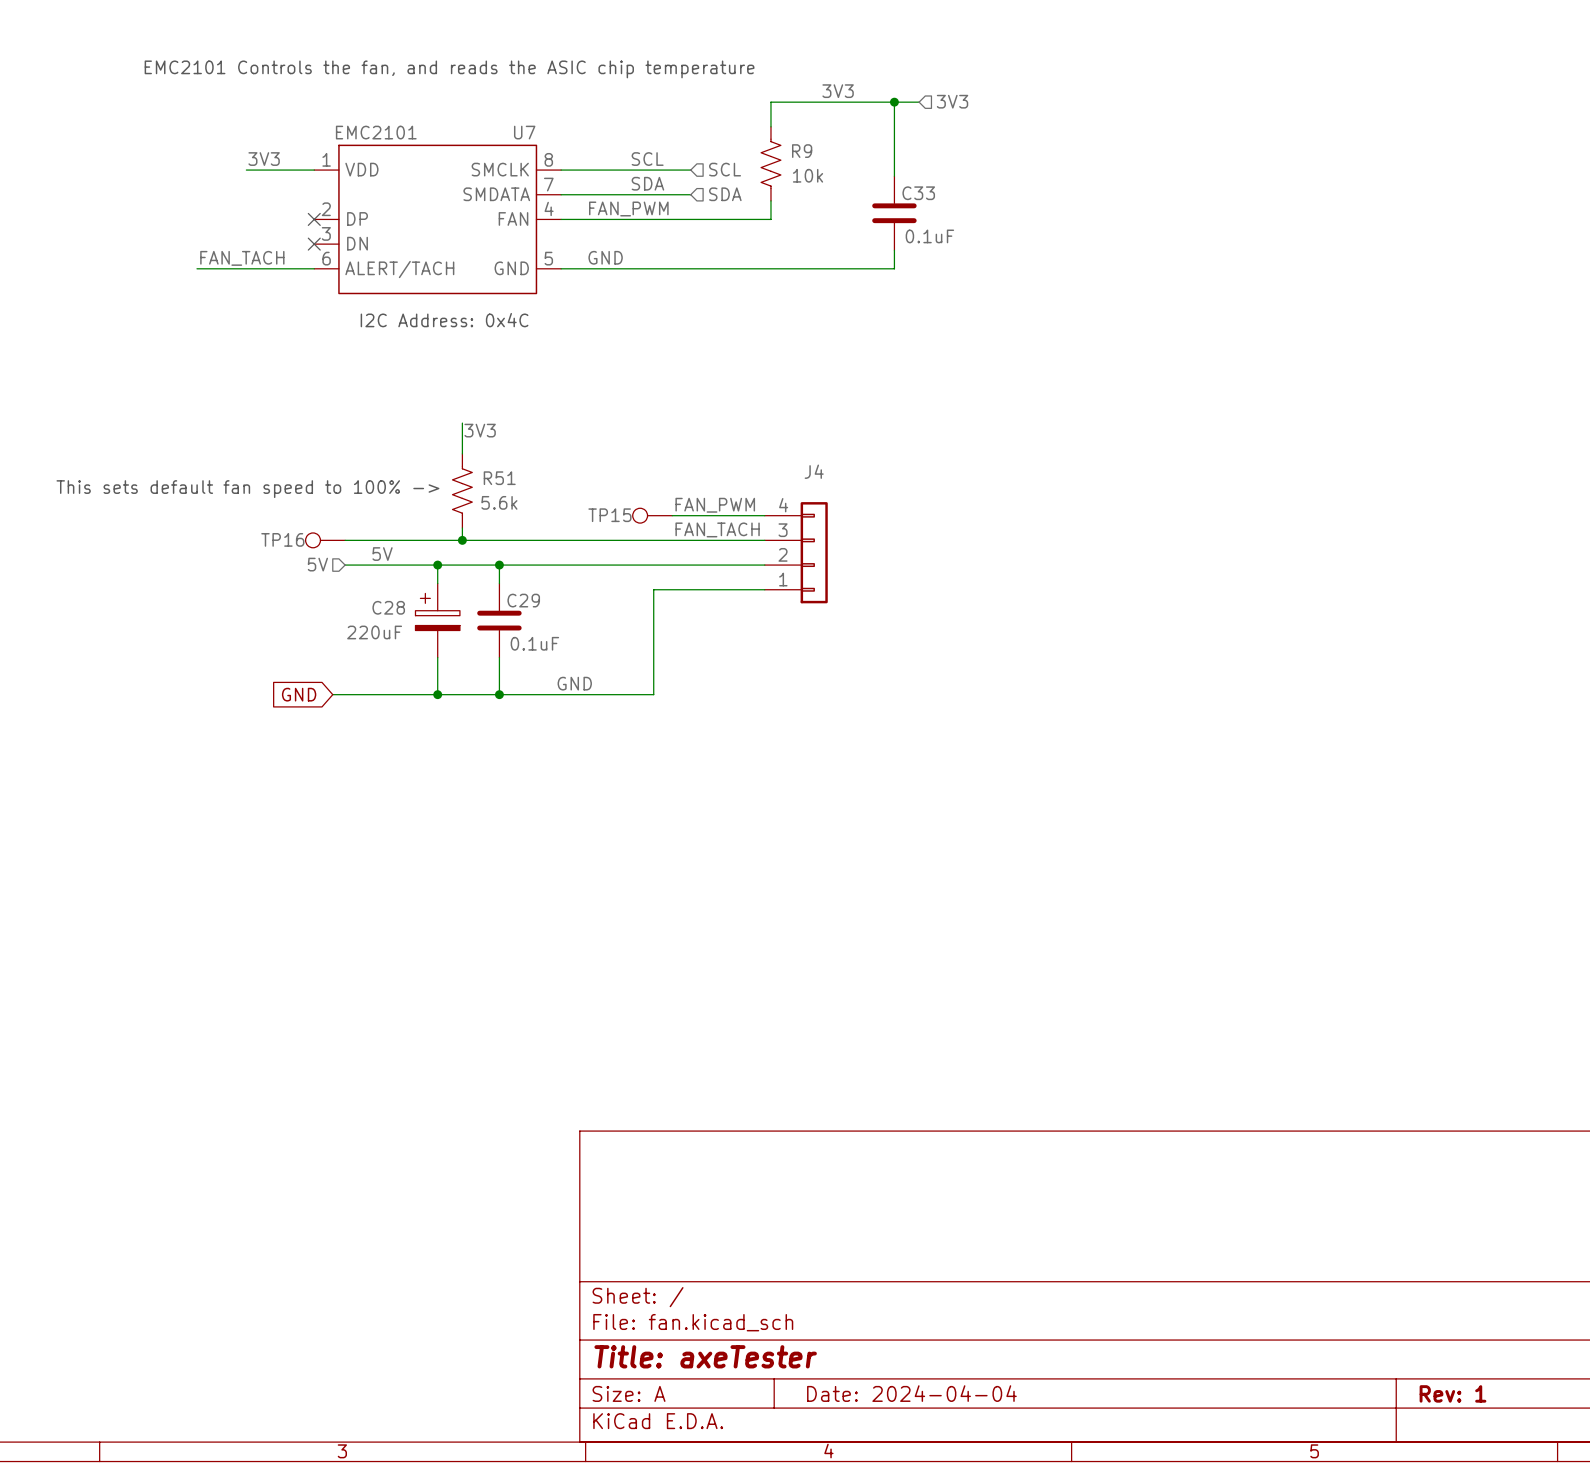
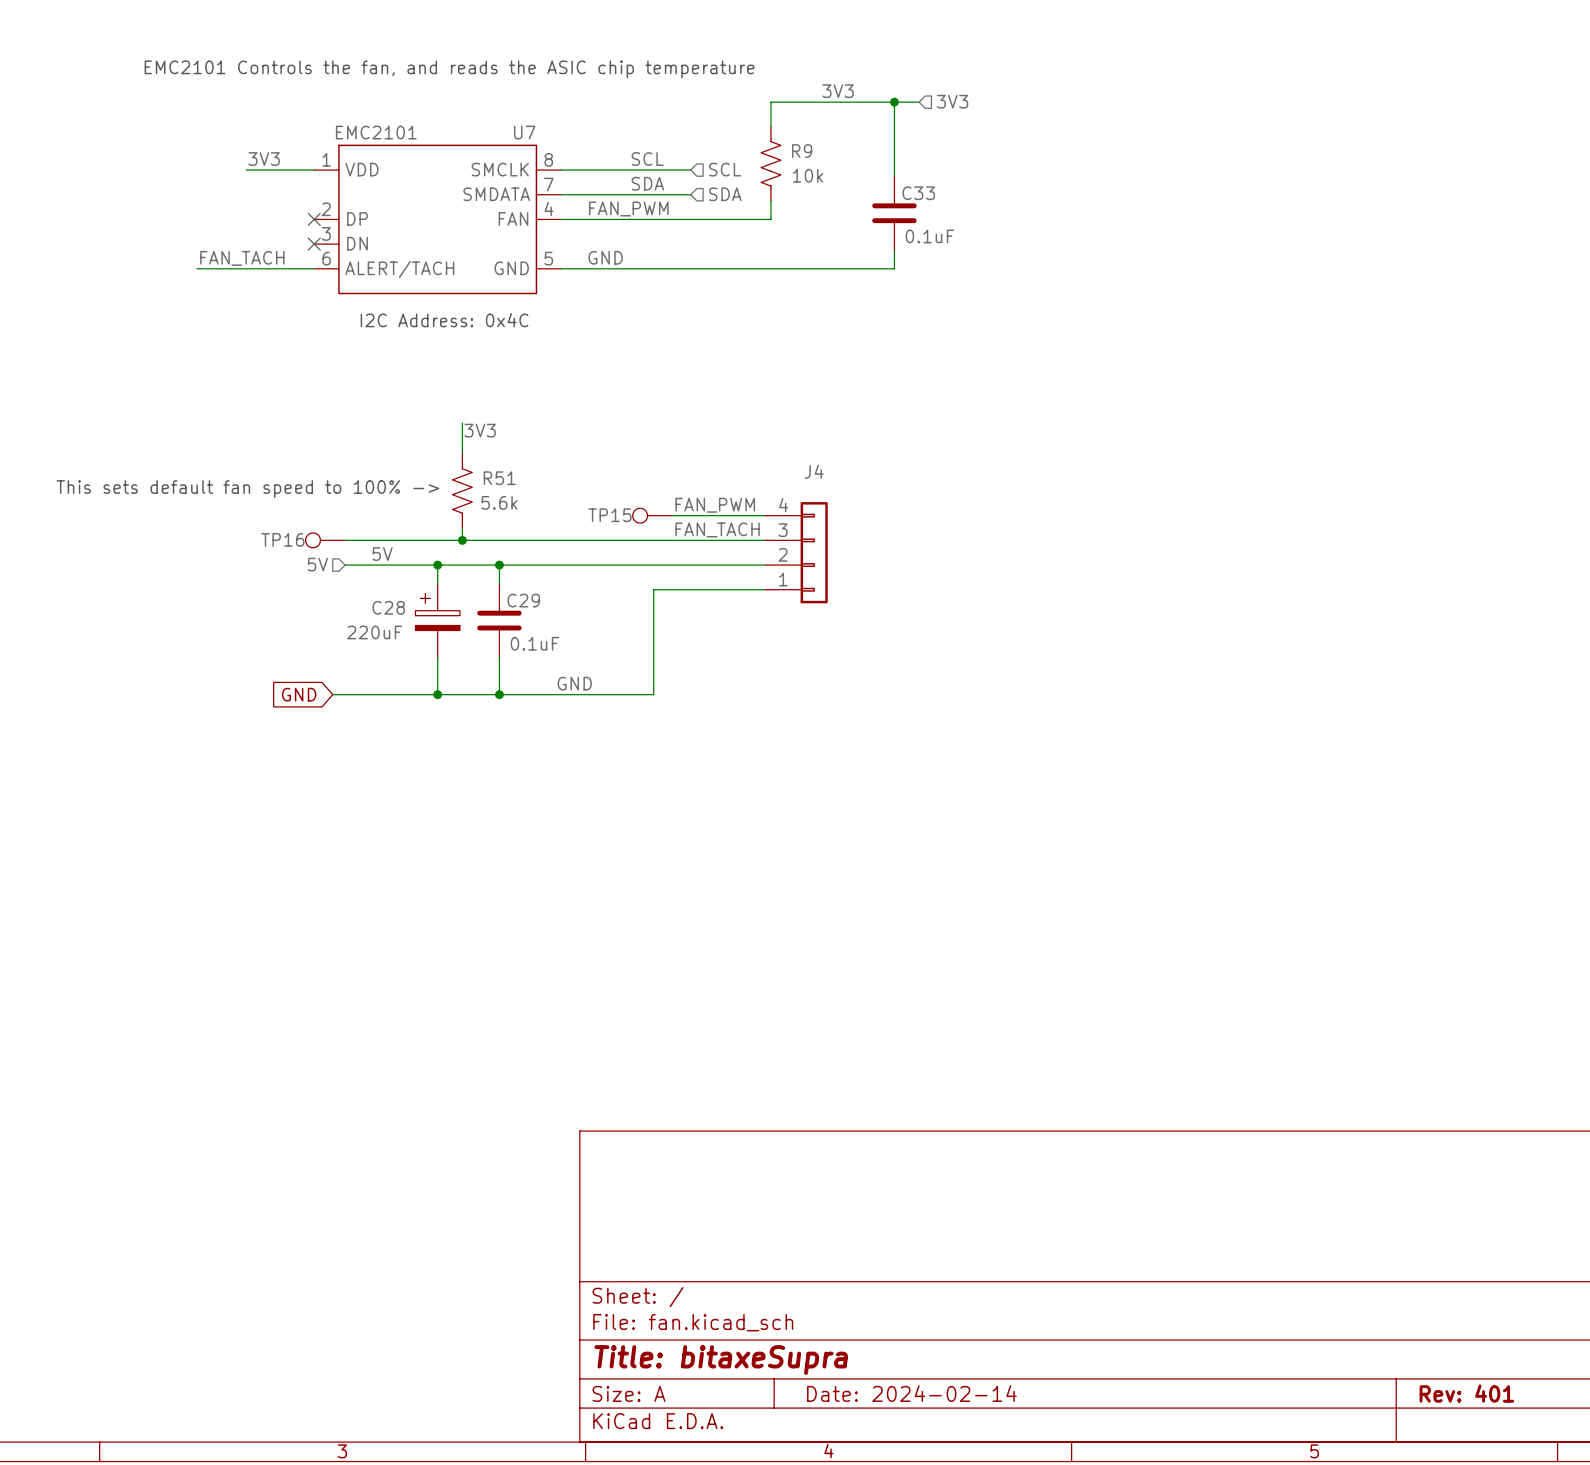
title block: Title: axeTester (705, 1356) -> Title: bitaxeSupra (721, 1360)
title block: Date: 2024-04-04 (911, 1393) -> Date: 2024-02-14 (911, 1393)
title block: Rev: 1 (1453, 1393) -> Rev: 401 (1466, 1393)

